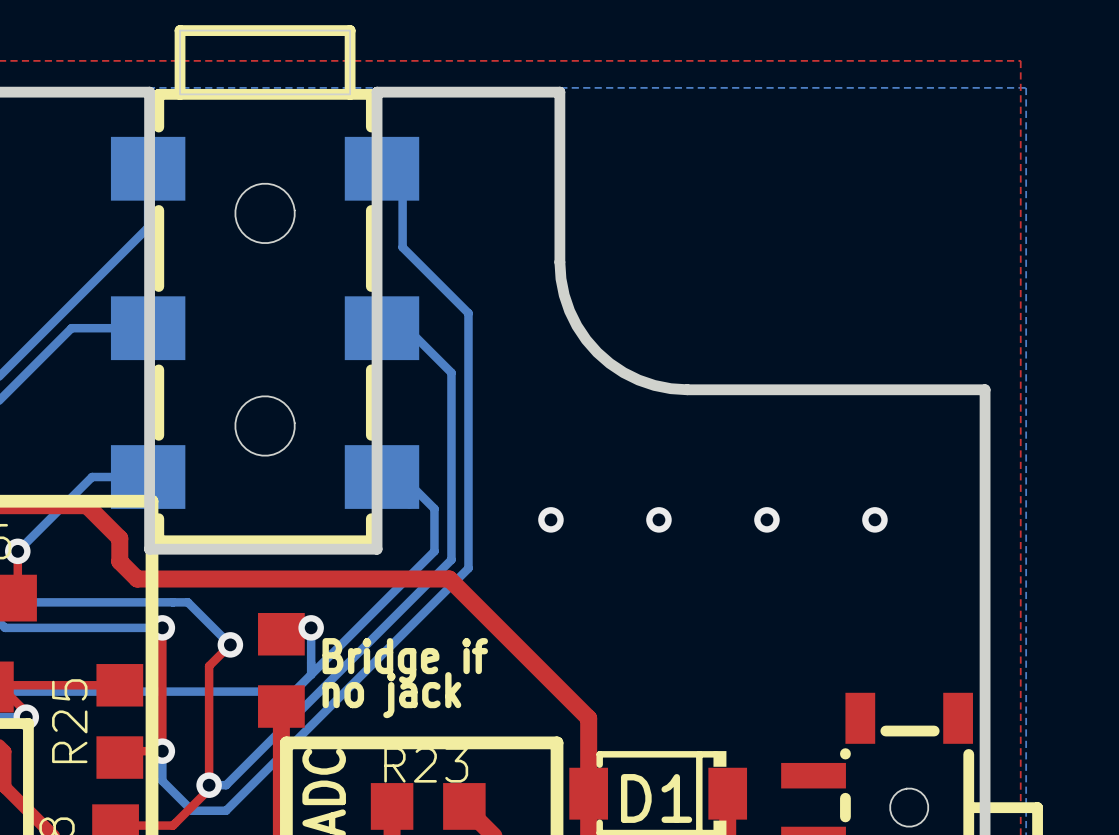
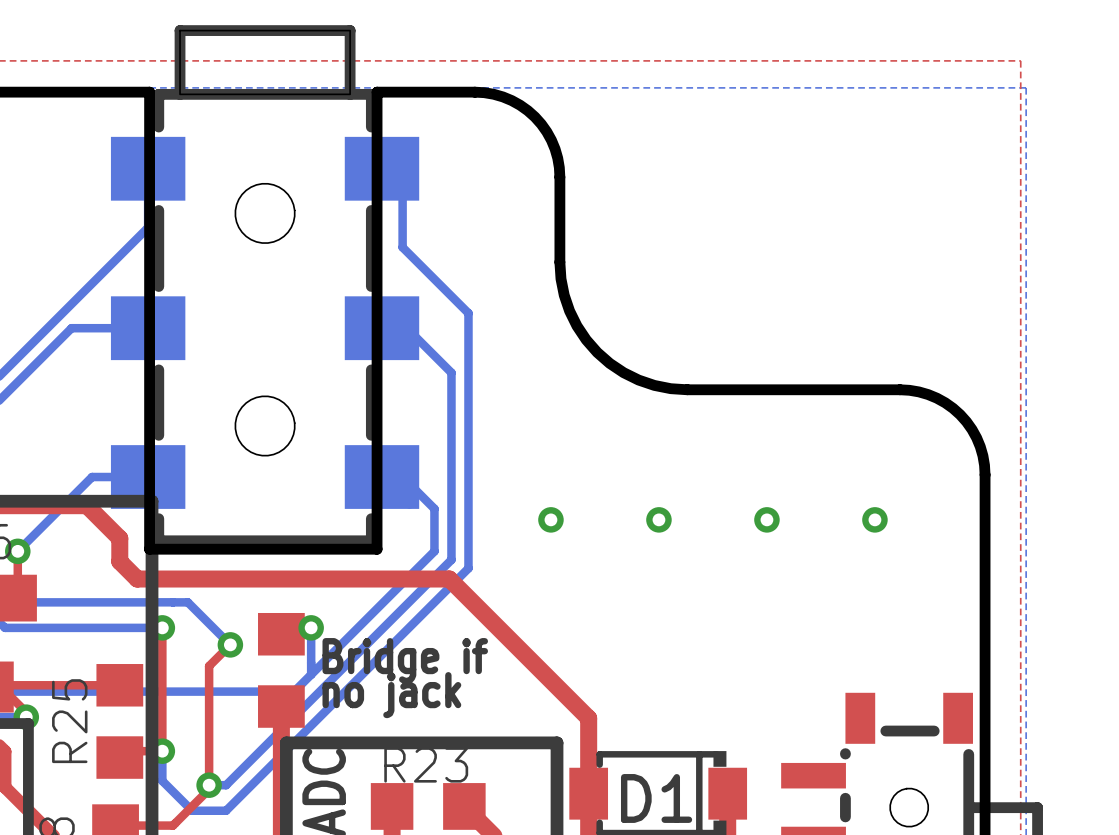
board edge: (474, 92) (559, 92) (559, 177) -> (474, 92) (493, 94) (511, 100) (534, 117) (551, 140) (557, 158) (559, 177)
board edge: (900, 389) (985, 389) (985, 474) -> (900, 389) (928, 394) (945, 402) (960, 414) (976, 437) (982, 455) (985, 474)

